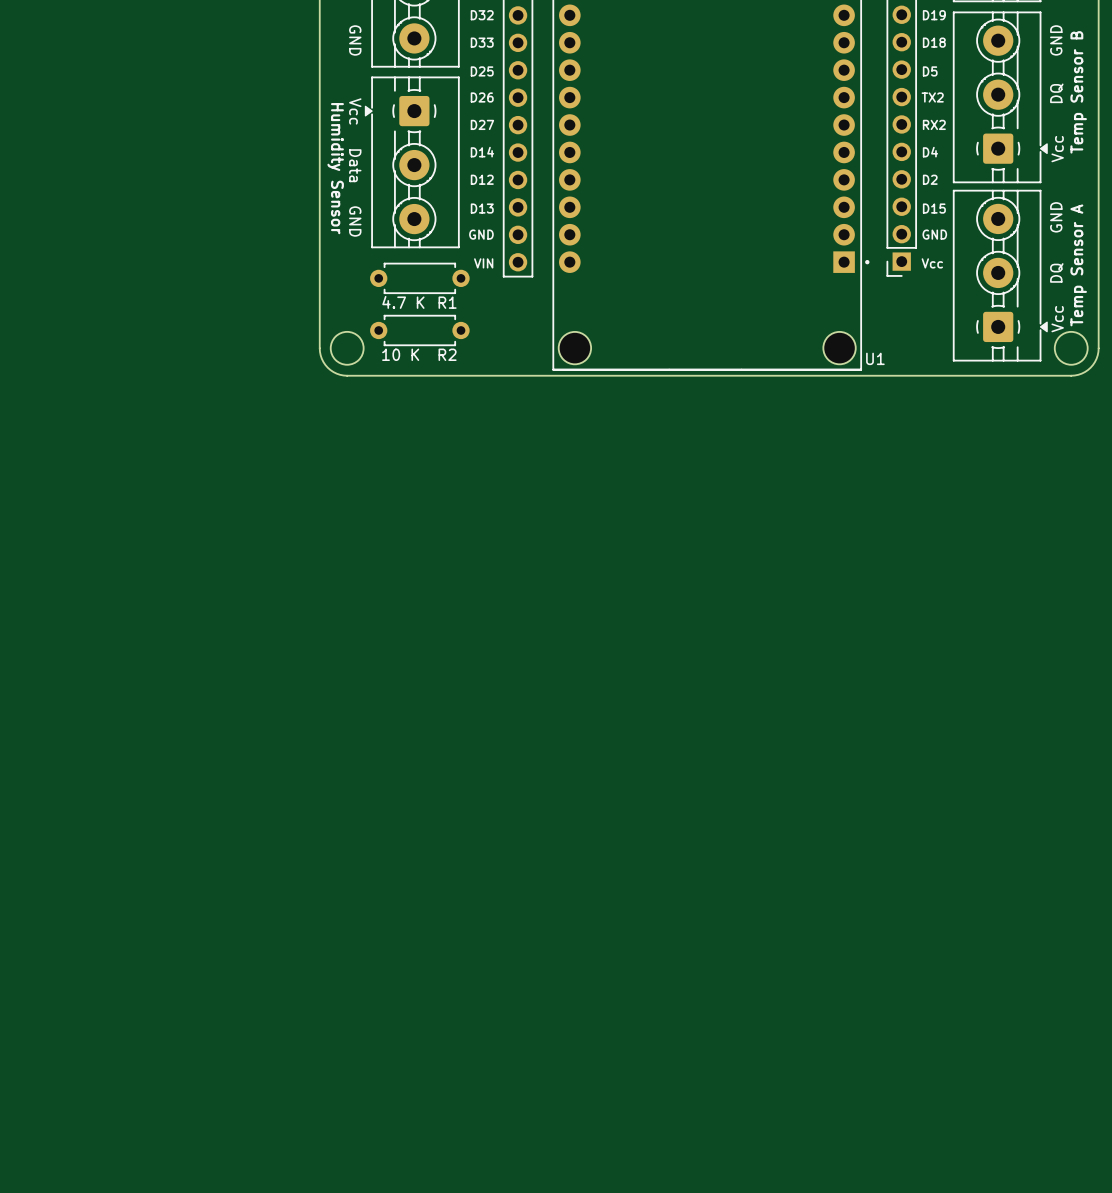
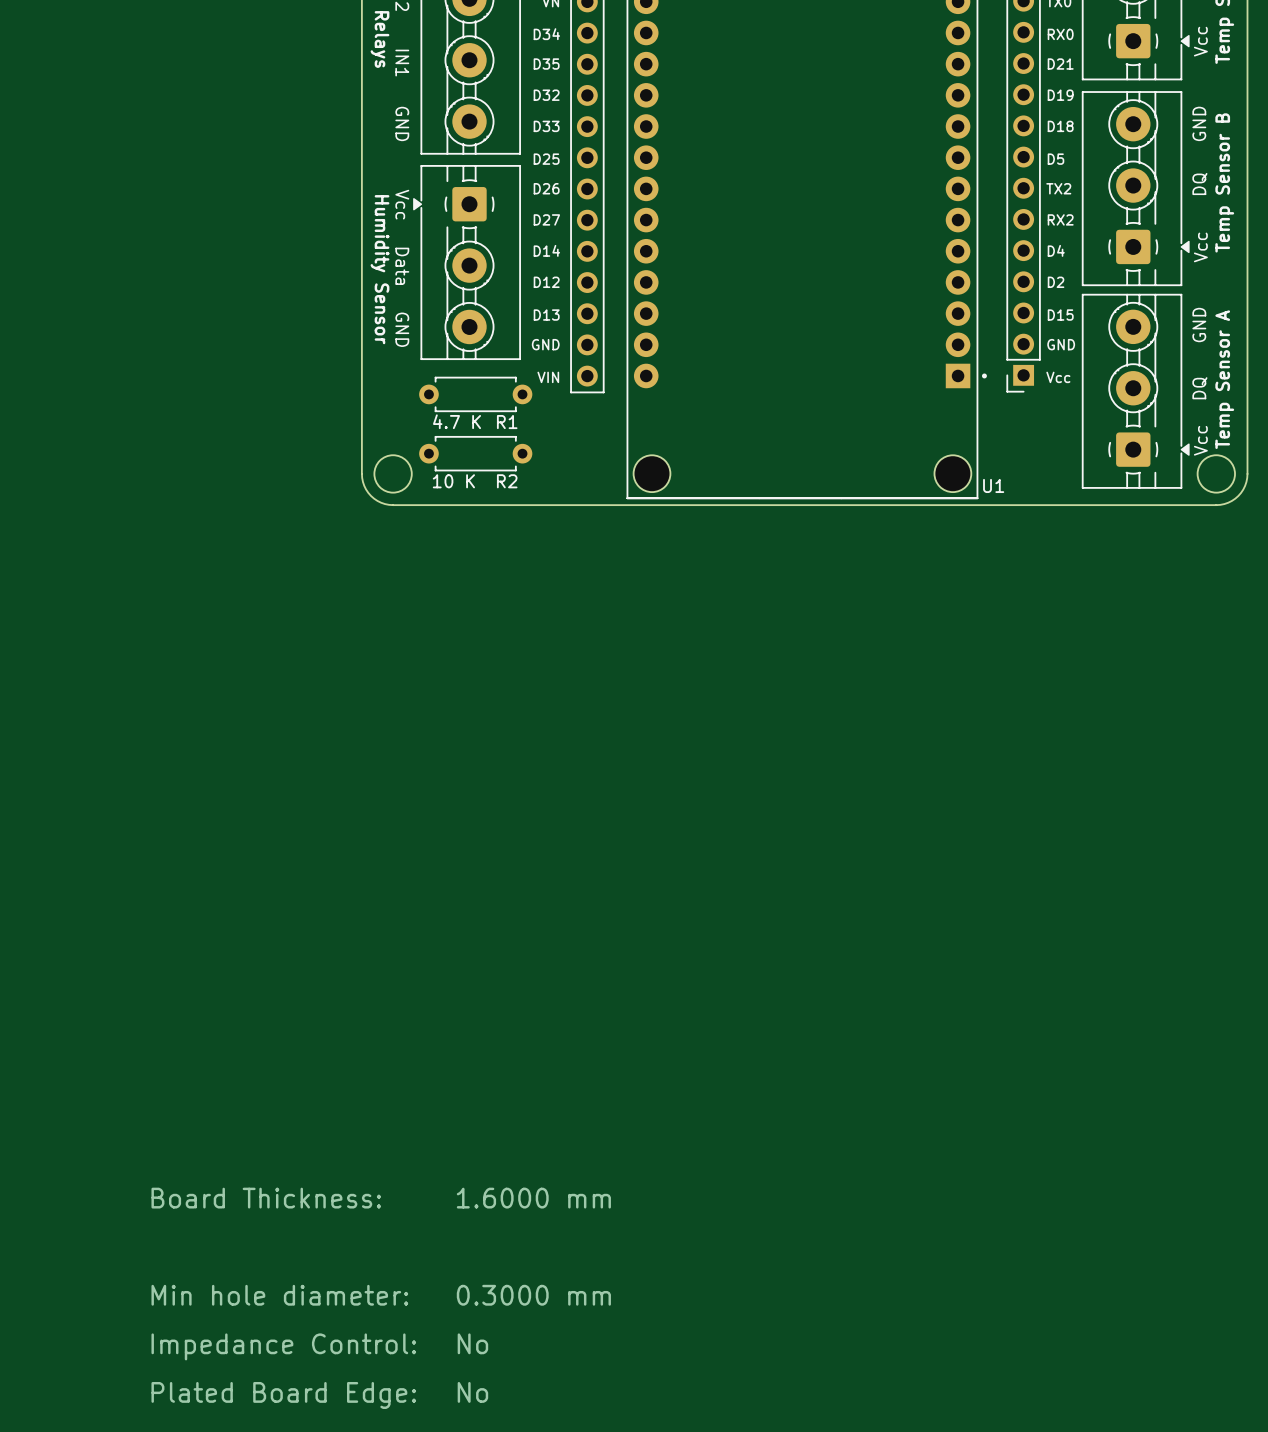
text: none -> Board Thickness: (266, 1198)
text: none -> 1.6000 mm (533, 1198)
text: none -> Min hole diameter: (279, 1295)
text: none -> 0.3000 mm (533, 1295)
text: none -> No (472, 1343)
text: none -> Impedance Control: (283, 1346)
text: none -> No (472, 1392)
text: none -> Plated Board Edge: (283, 1395)

